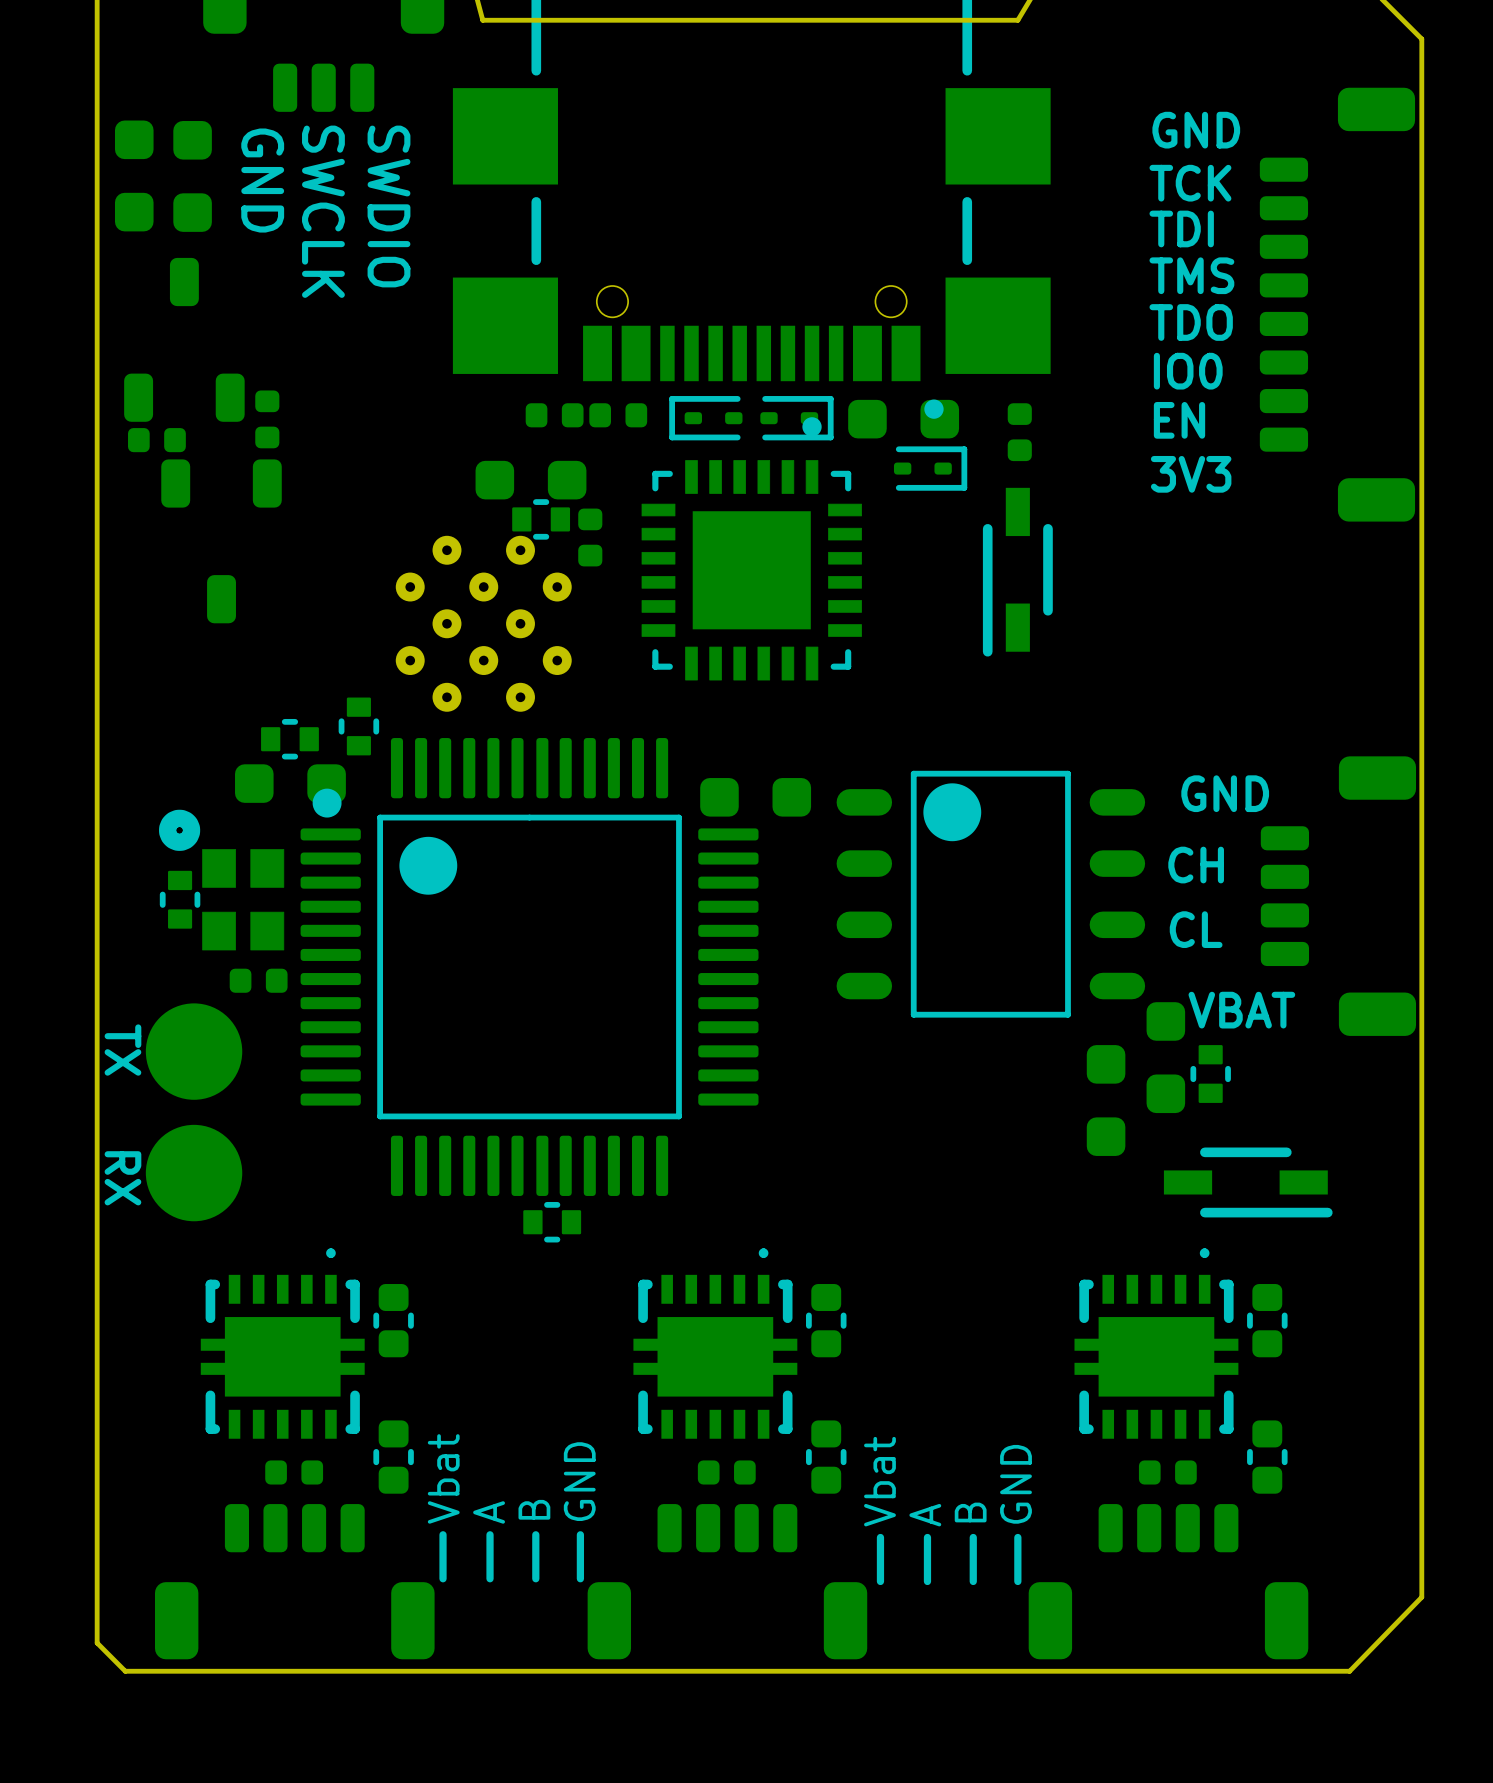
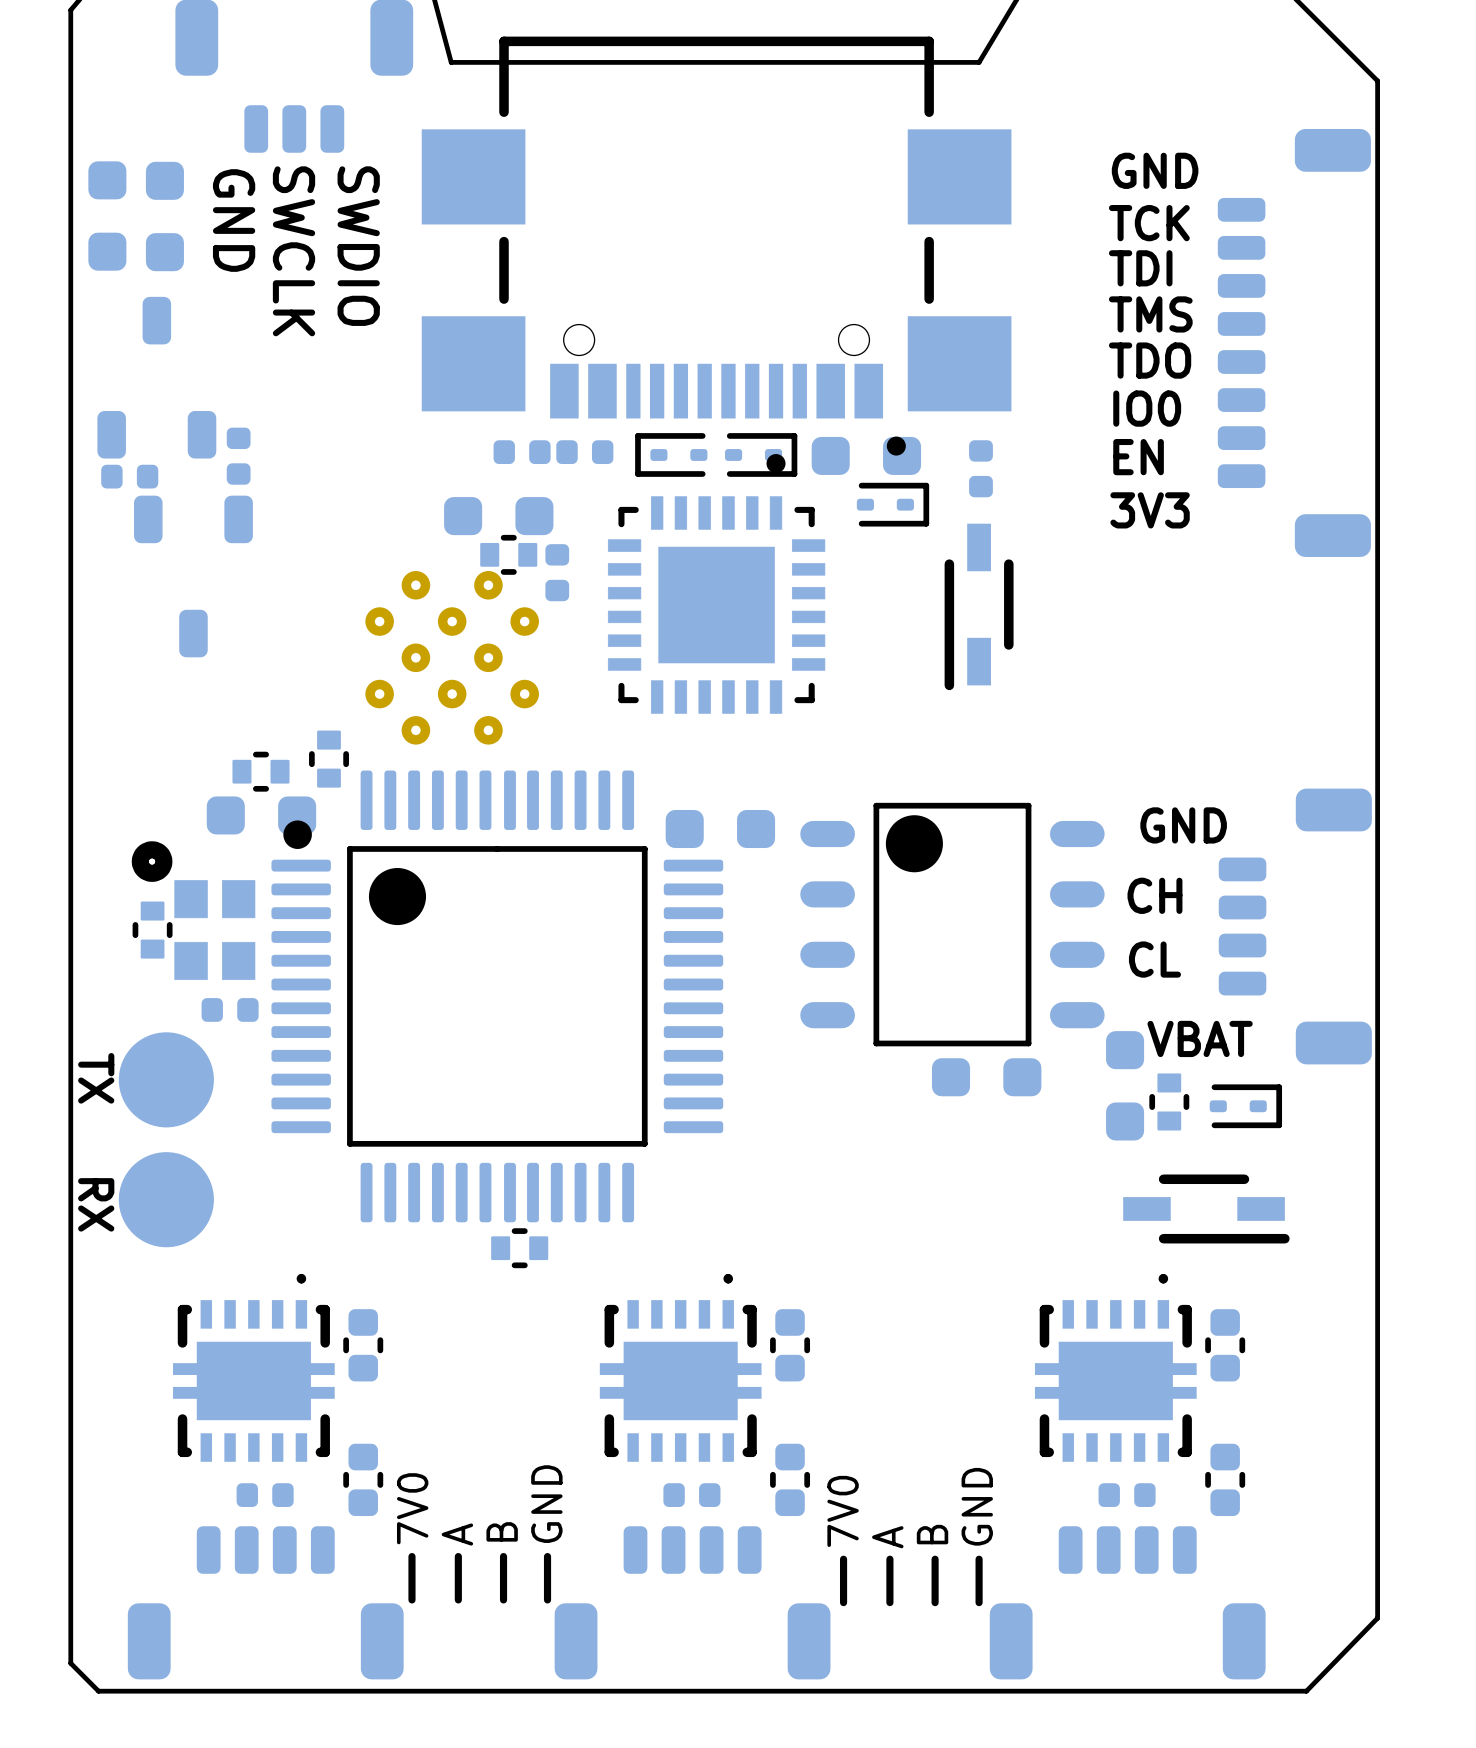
part: none -> (1245, 1106)
part rotation: 0° (1106, 1100) -> 90° clockwise (986, 1077)
part position: (1106, 1100) -> (986, 1077)
text: Vbat (443, 1478) -> 7V0 (412, 1508)
text: Vbat (879, 1481) -> 7V0 (843, 1511)

